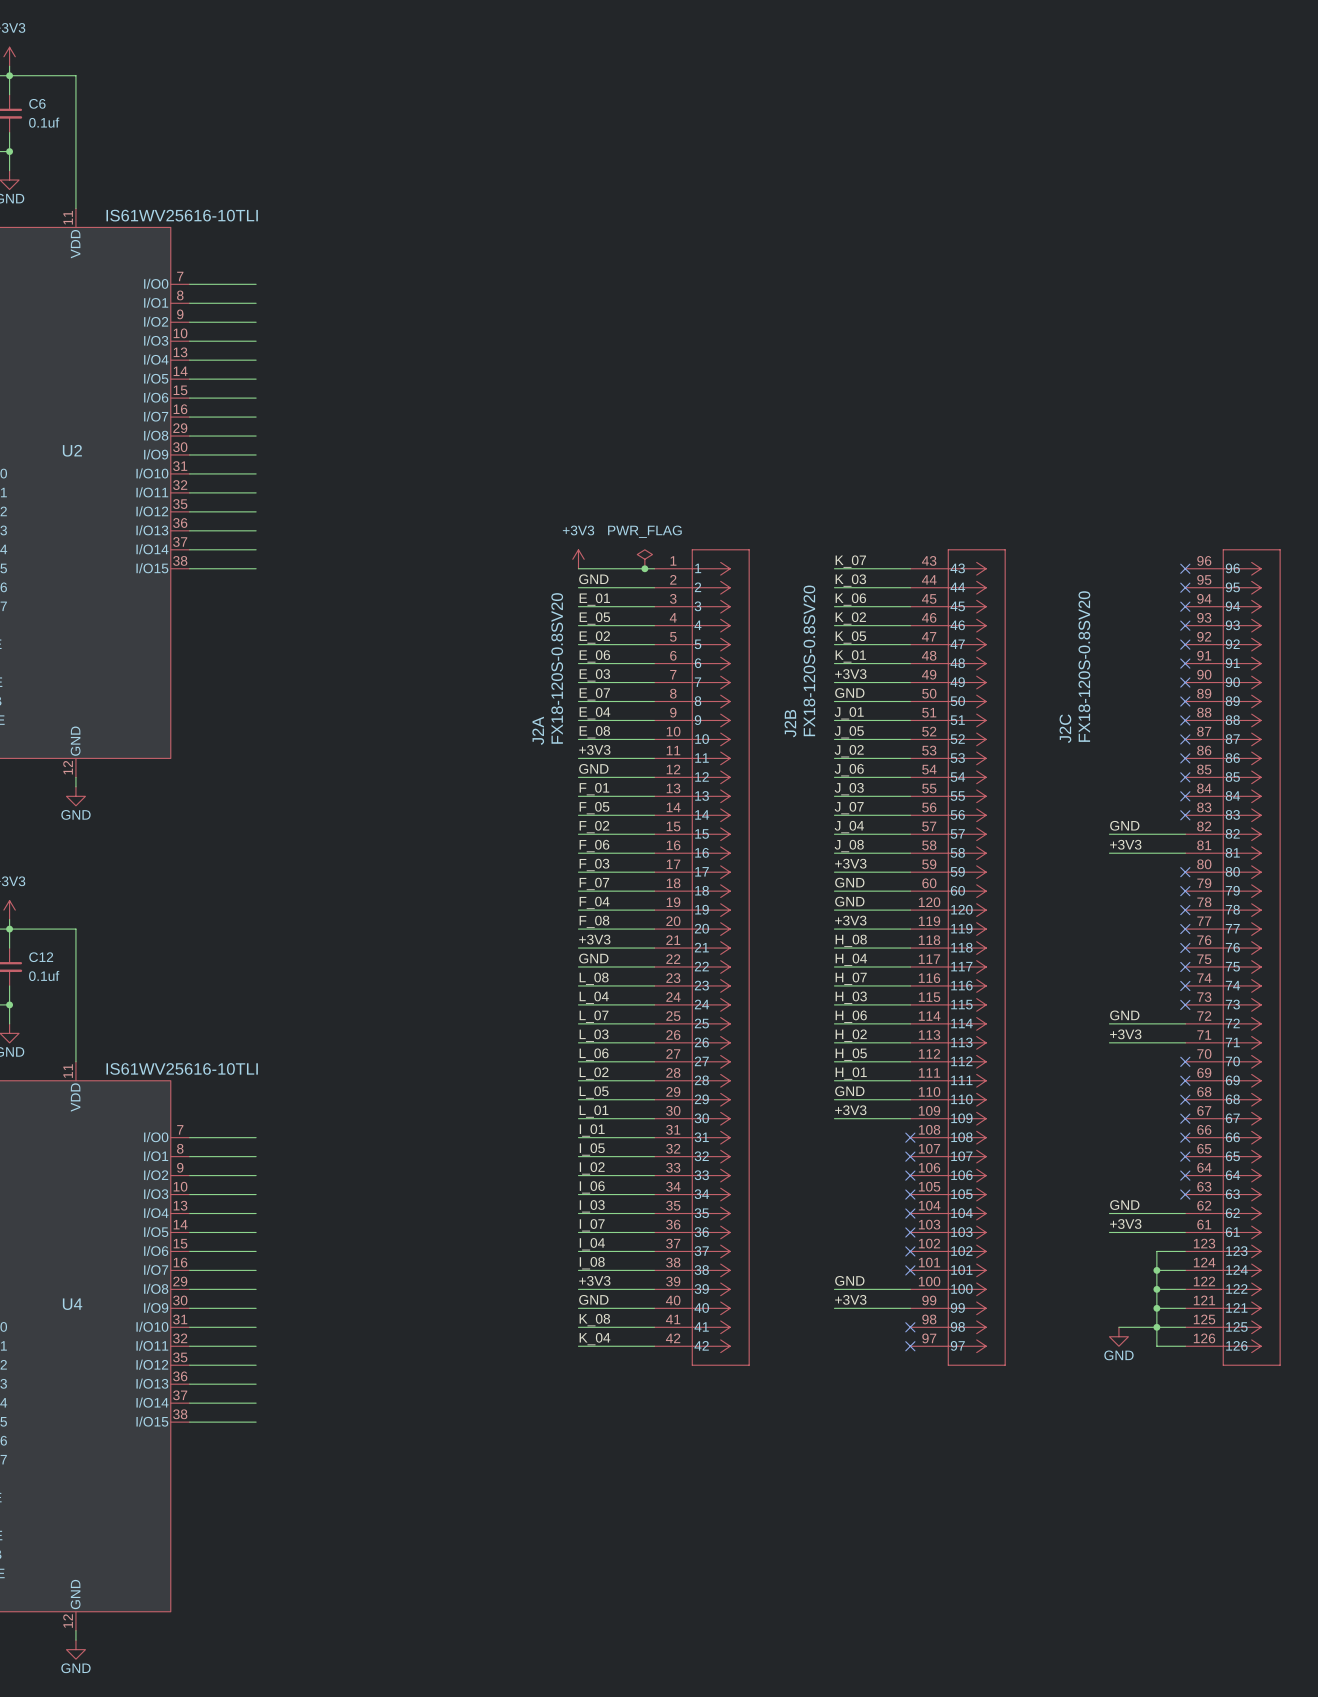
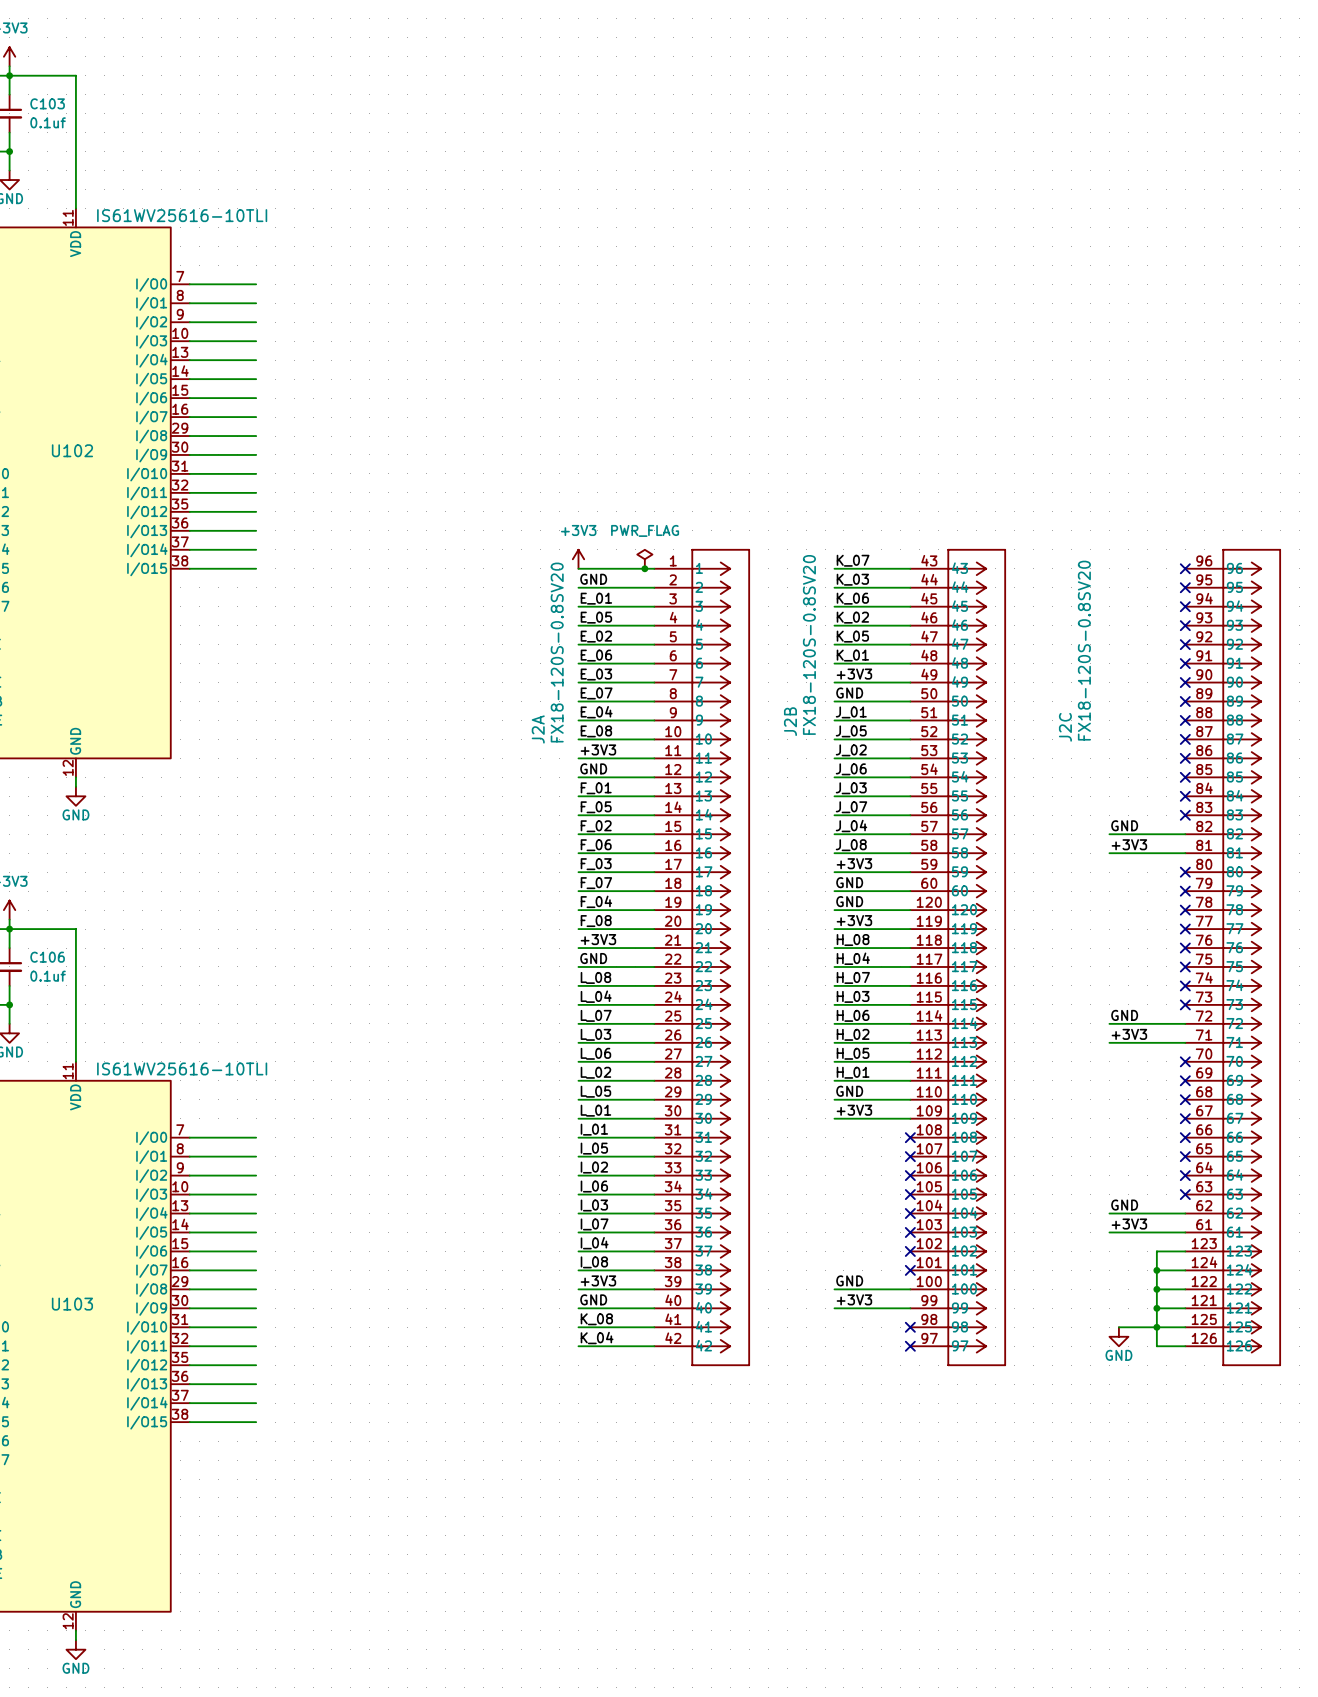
C6 name: C6 (37, 103) -> C103 (47, 103)
U2 name: U2 (72, 450) -> U102 (72, 450)
C12 name: C12 (41, 957) -> C106 (47, 957)
U4 name: U4 (72, 1304) -> U103 (72, 1304)

